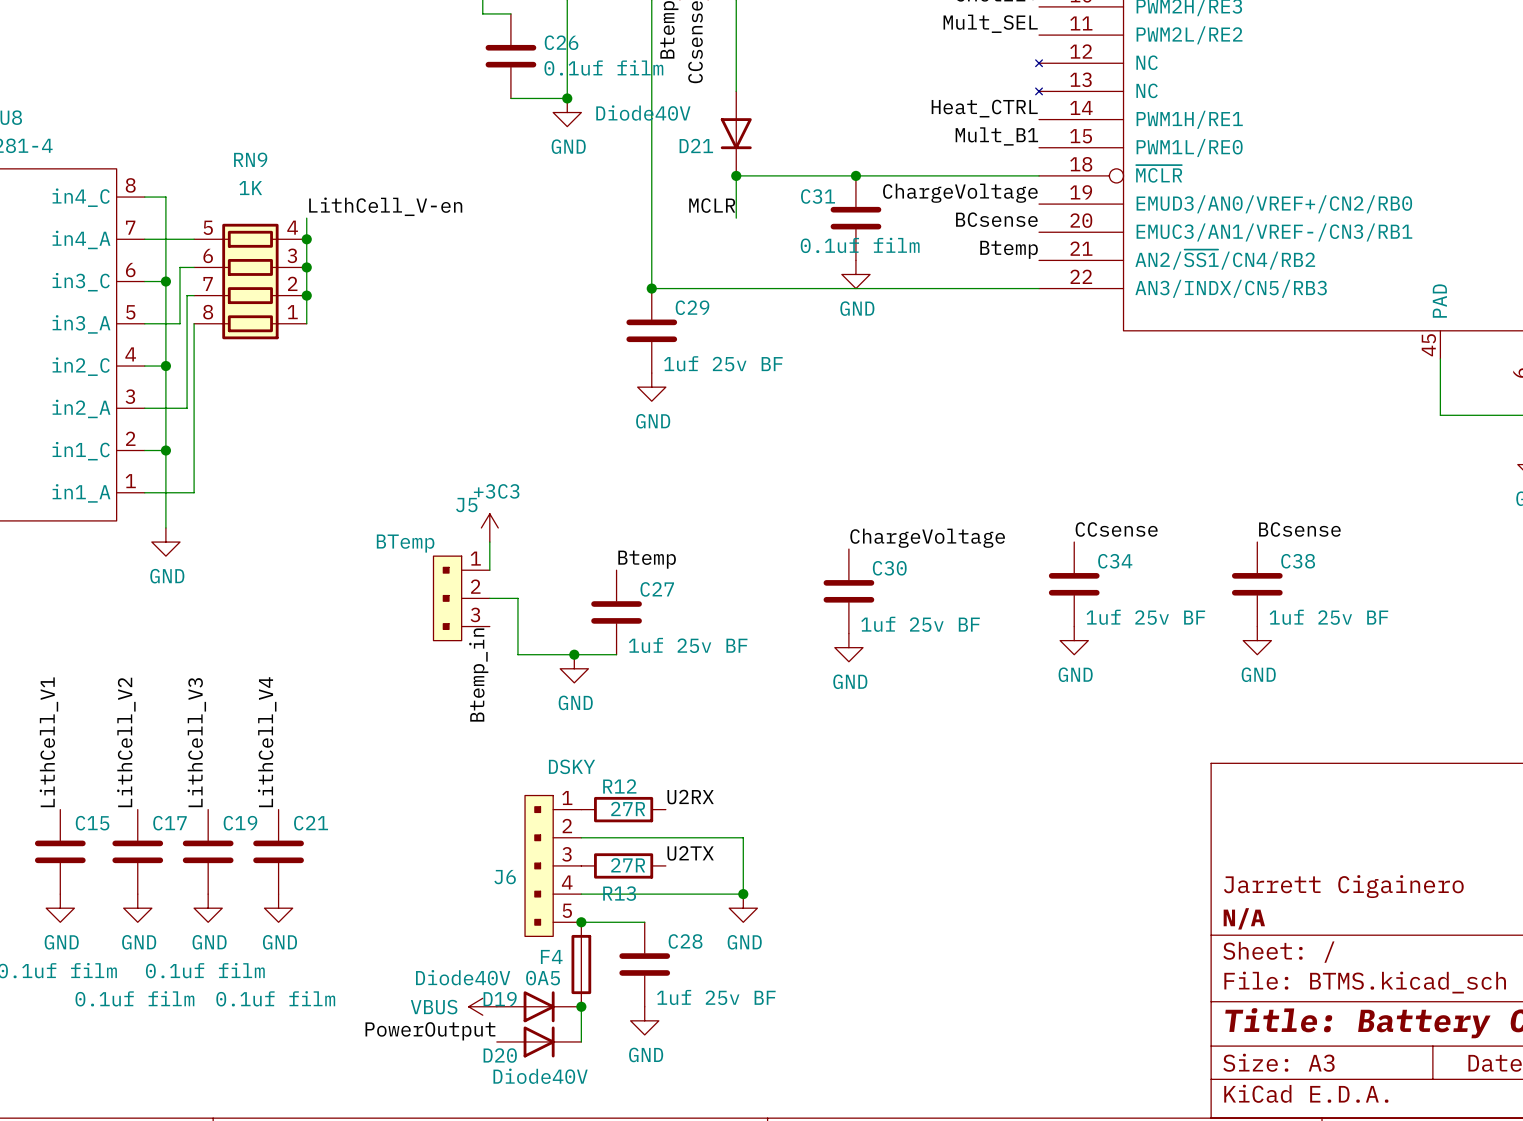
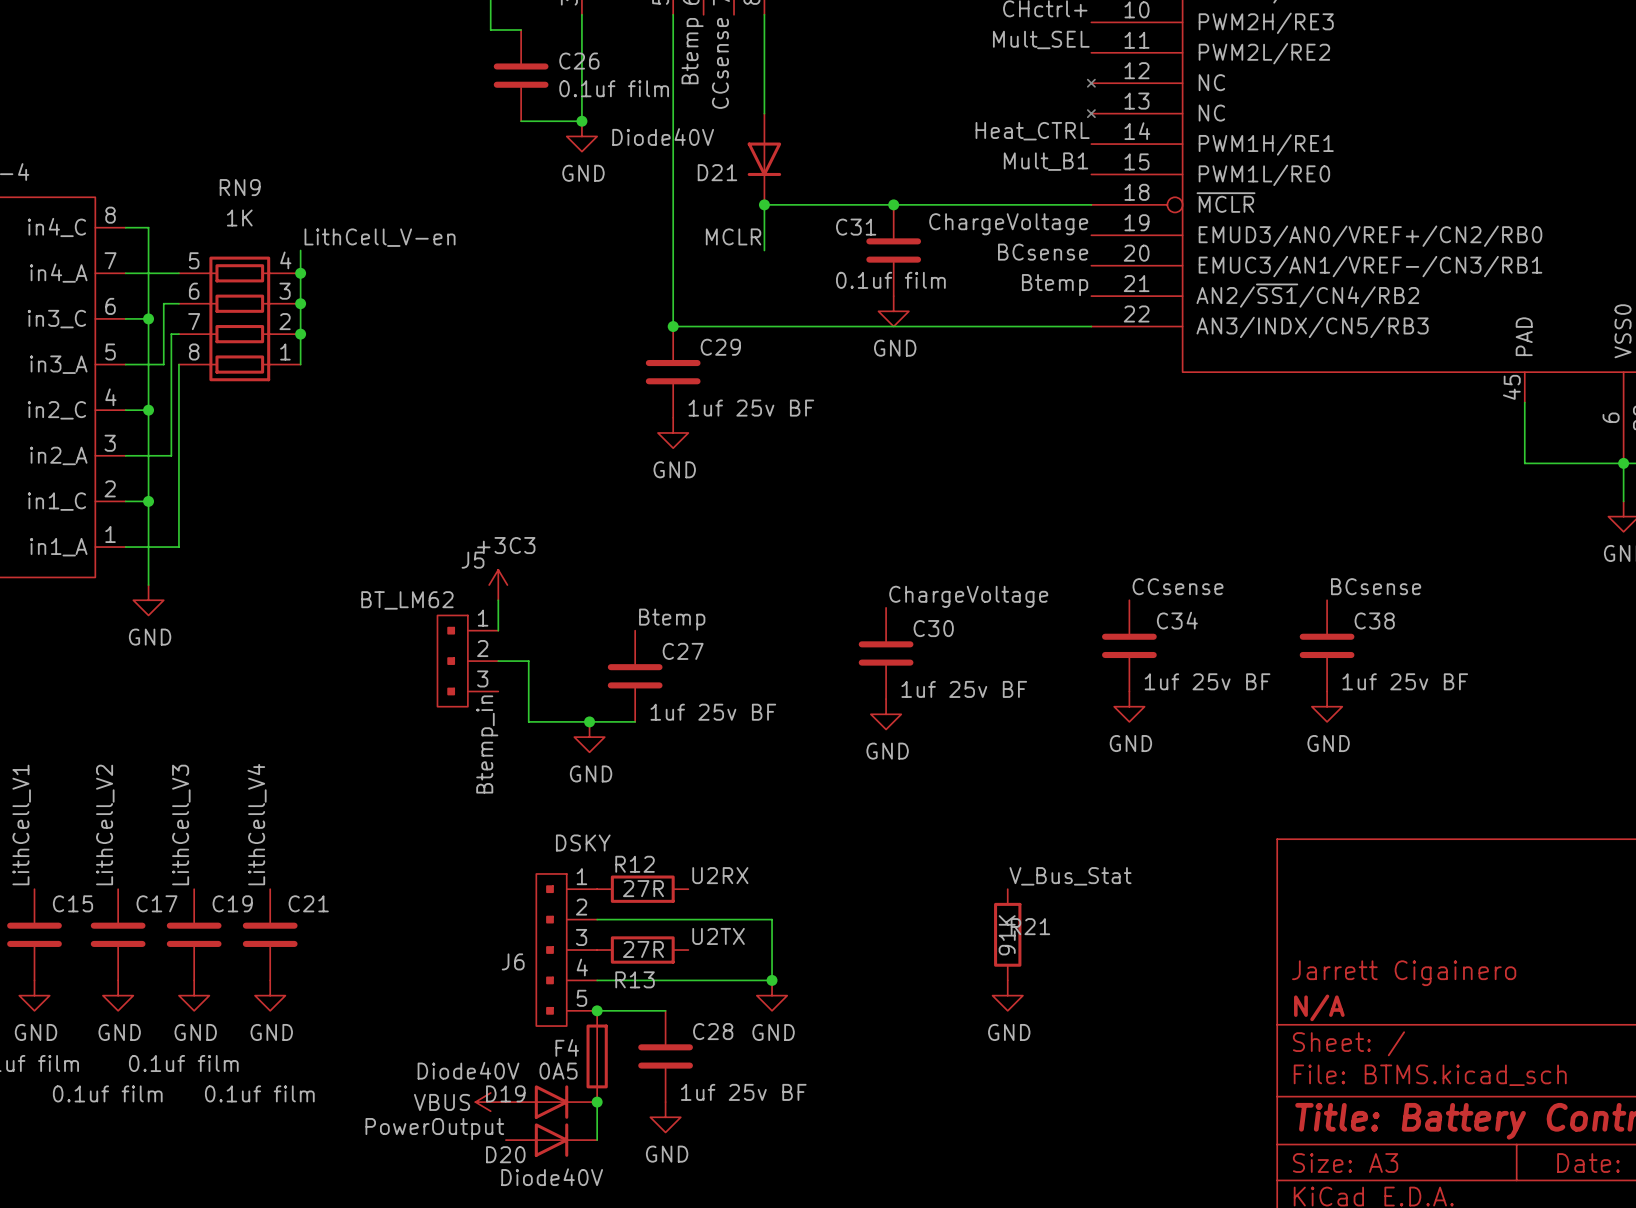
J5 value: BTemp (405, 543) -> BT_LM62 (407, 600)
label: none -> V_Bus_Stat (1070, 876)
R21: none -> 91K (1007, 934)
power symbol: none -> GND (1007, 995)

